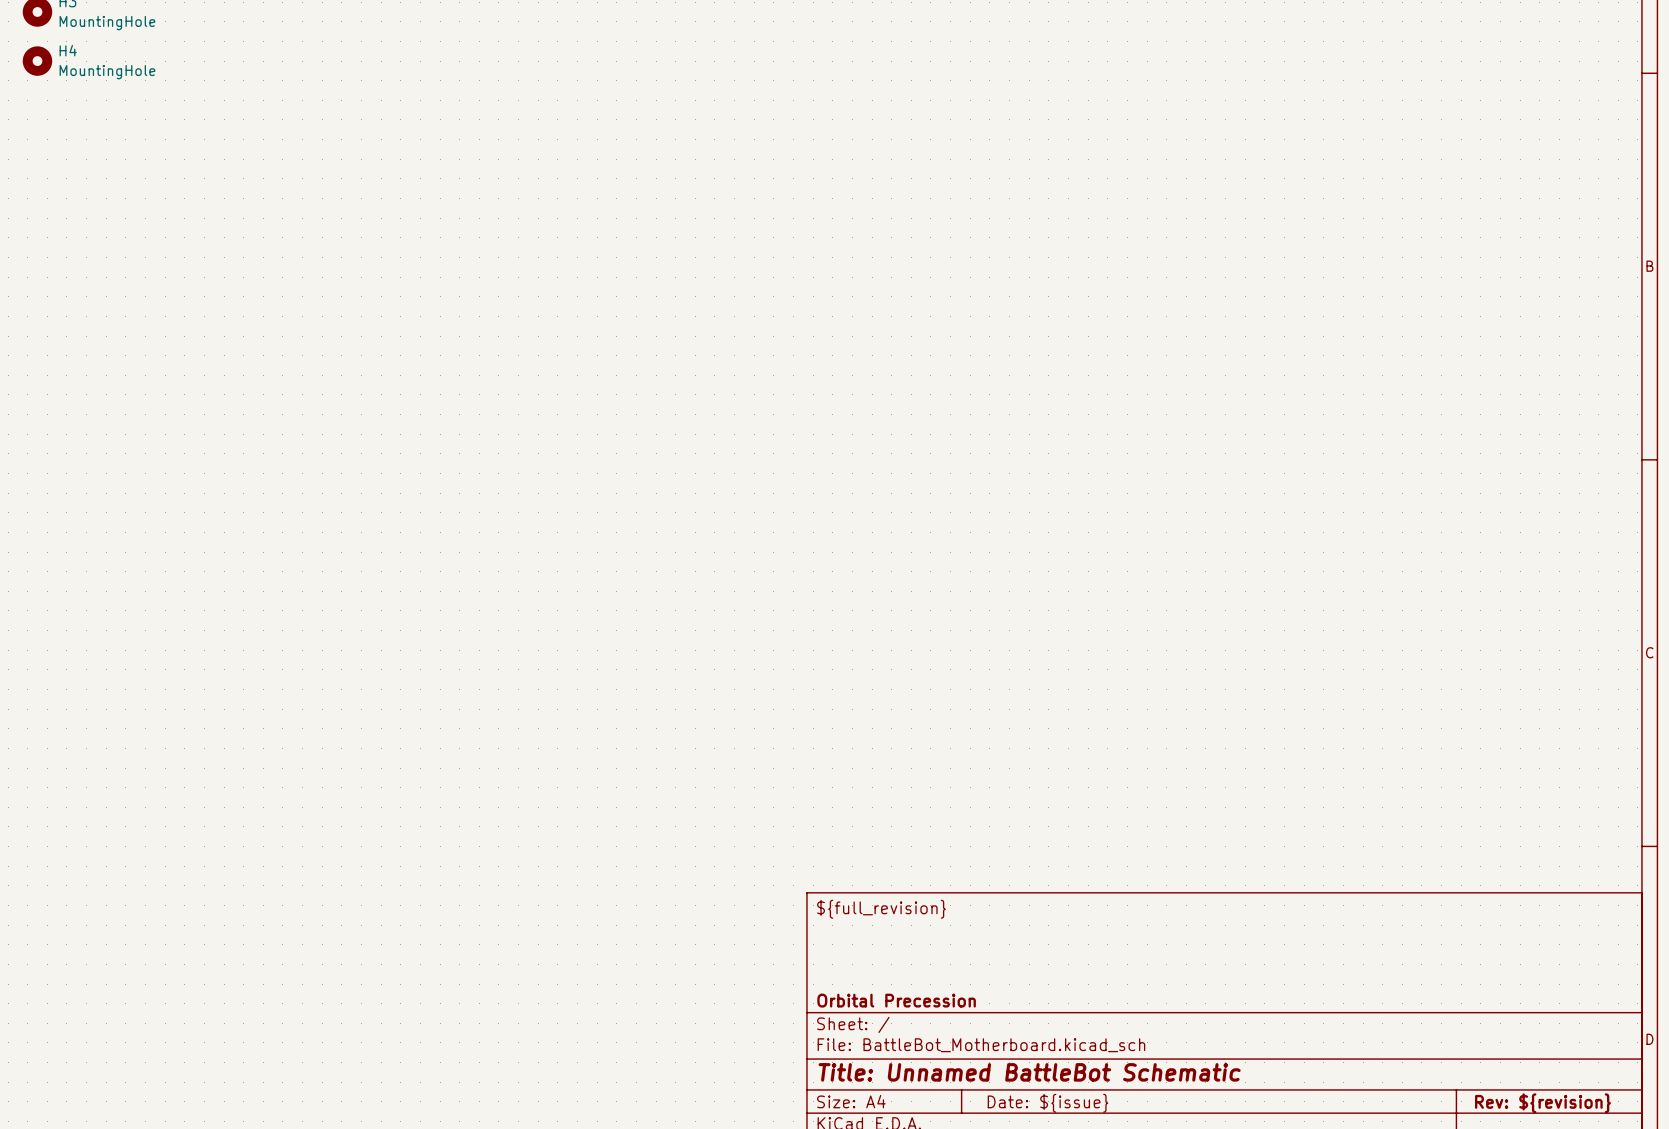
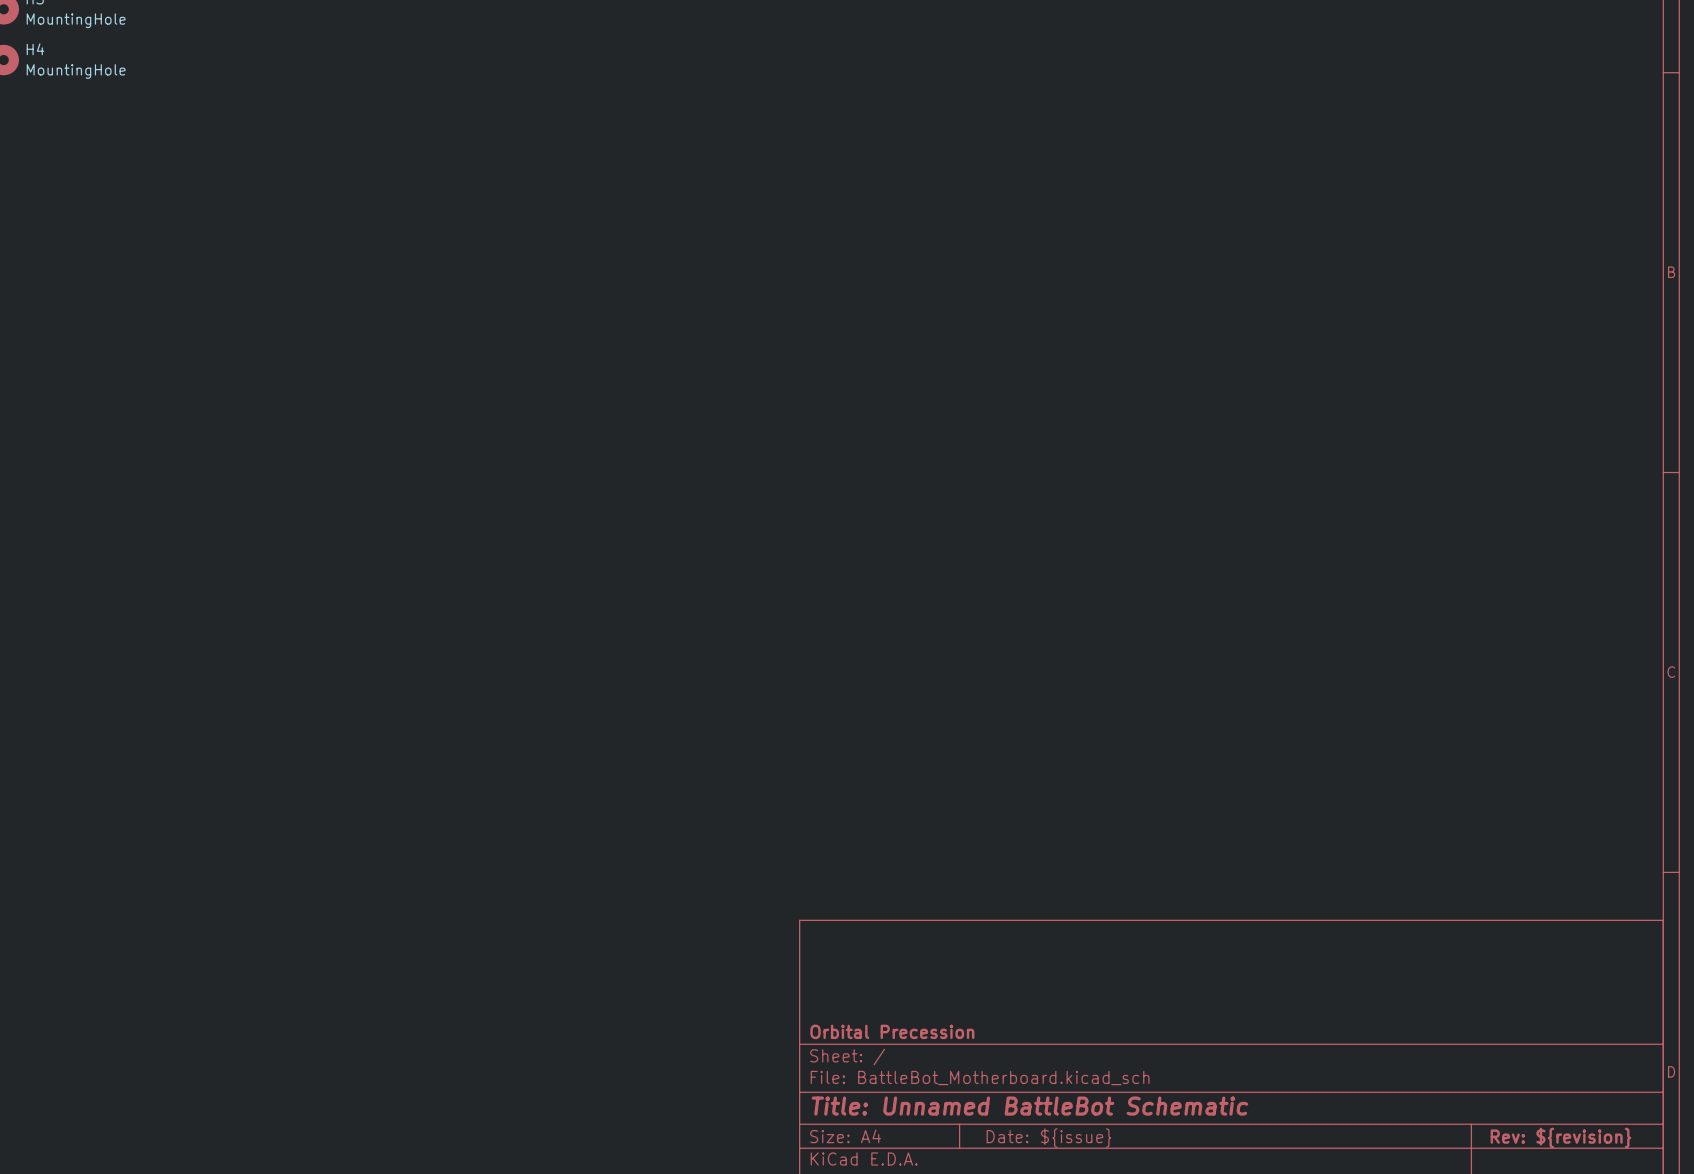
title block: ${full_revision} (881, 909) -> none

